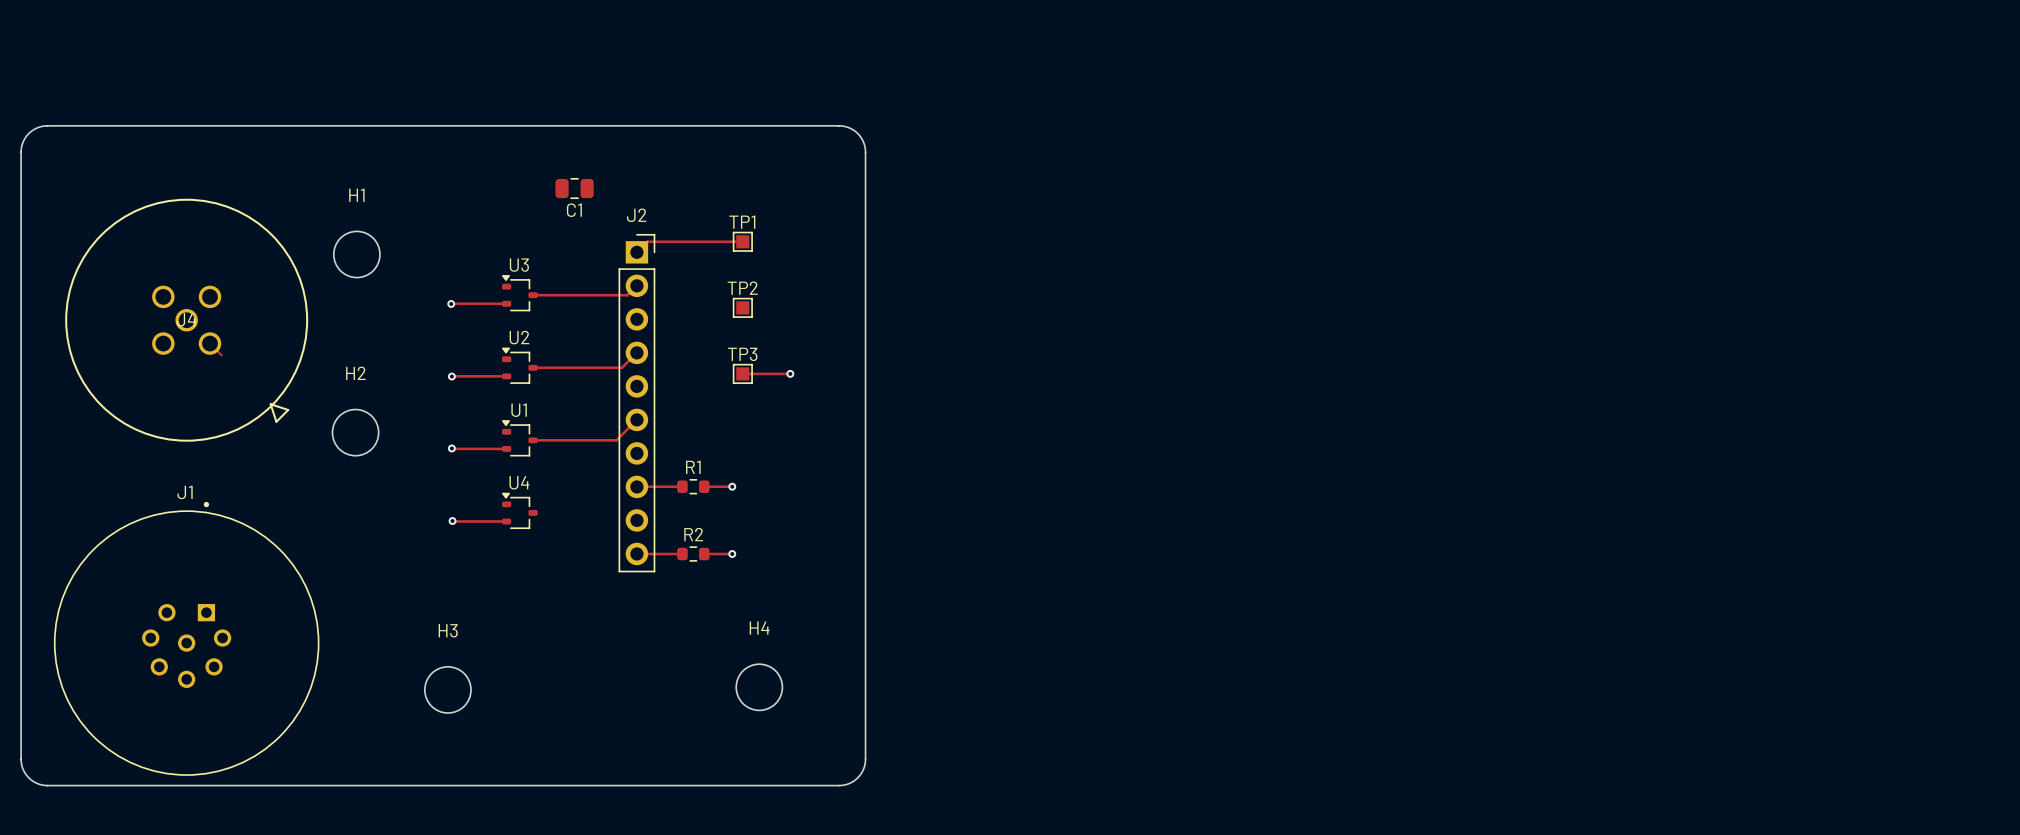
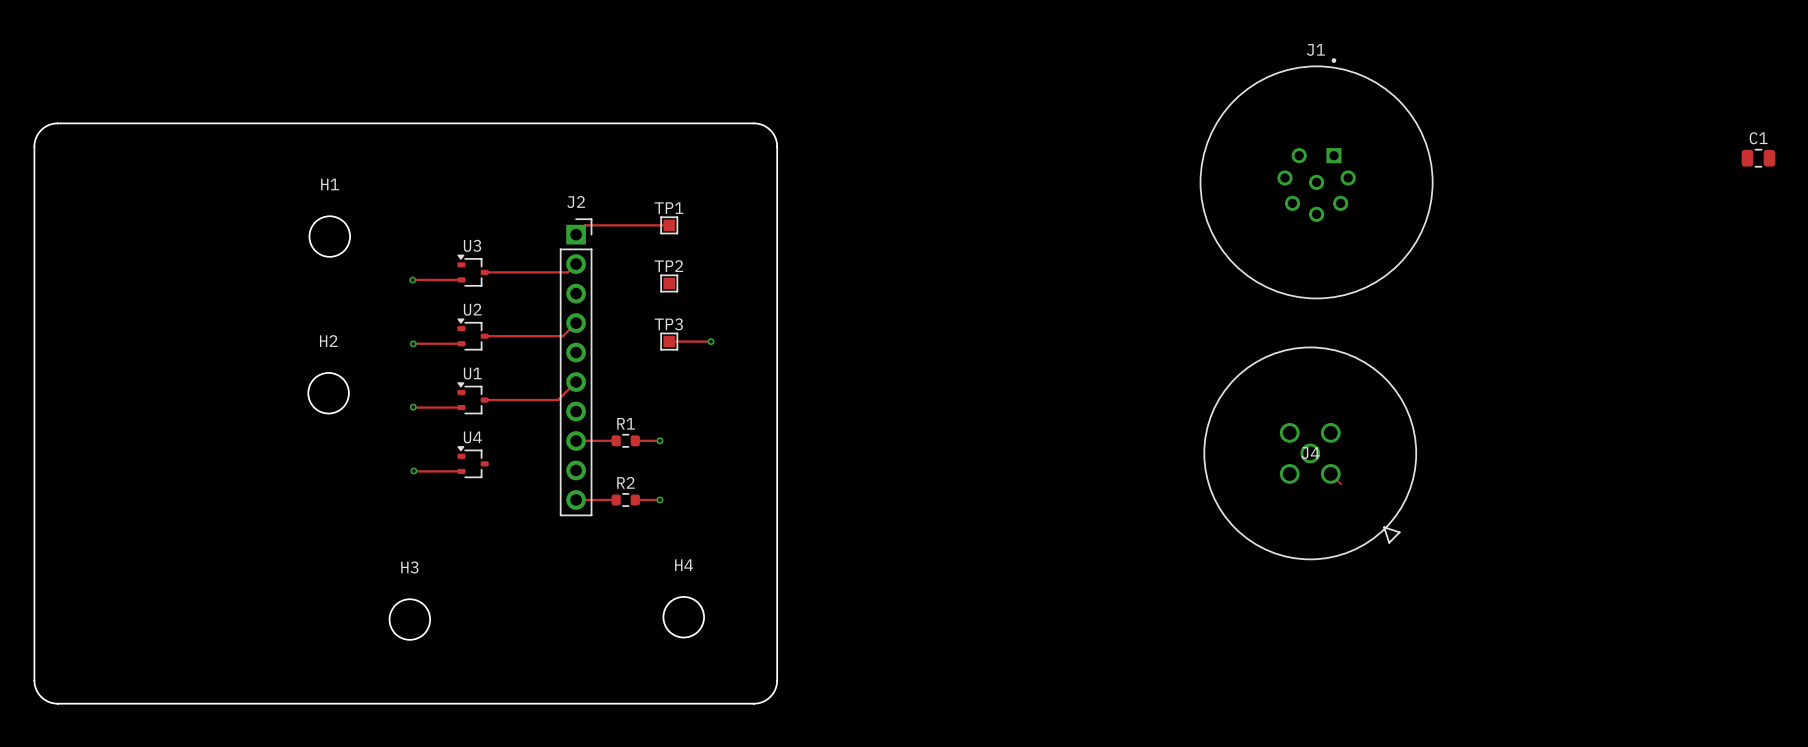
C1 position: (574, 188) -> (1758, 158)
C1 name position: C1 (574, 210) -> C1 (1758, 138)
J4 position: (186, 320) -> (1310, 453)
J1 position: (186, 638) -> (1316, 178)

